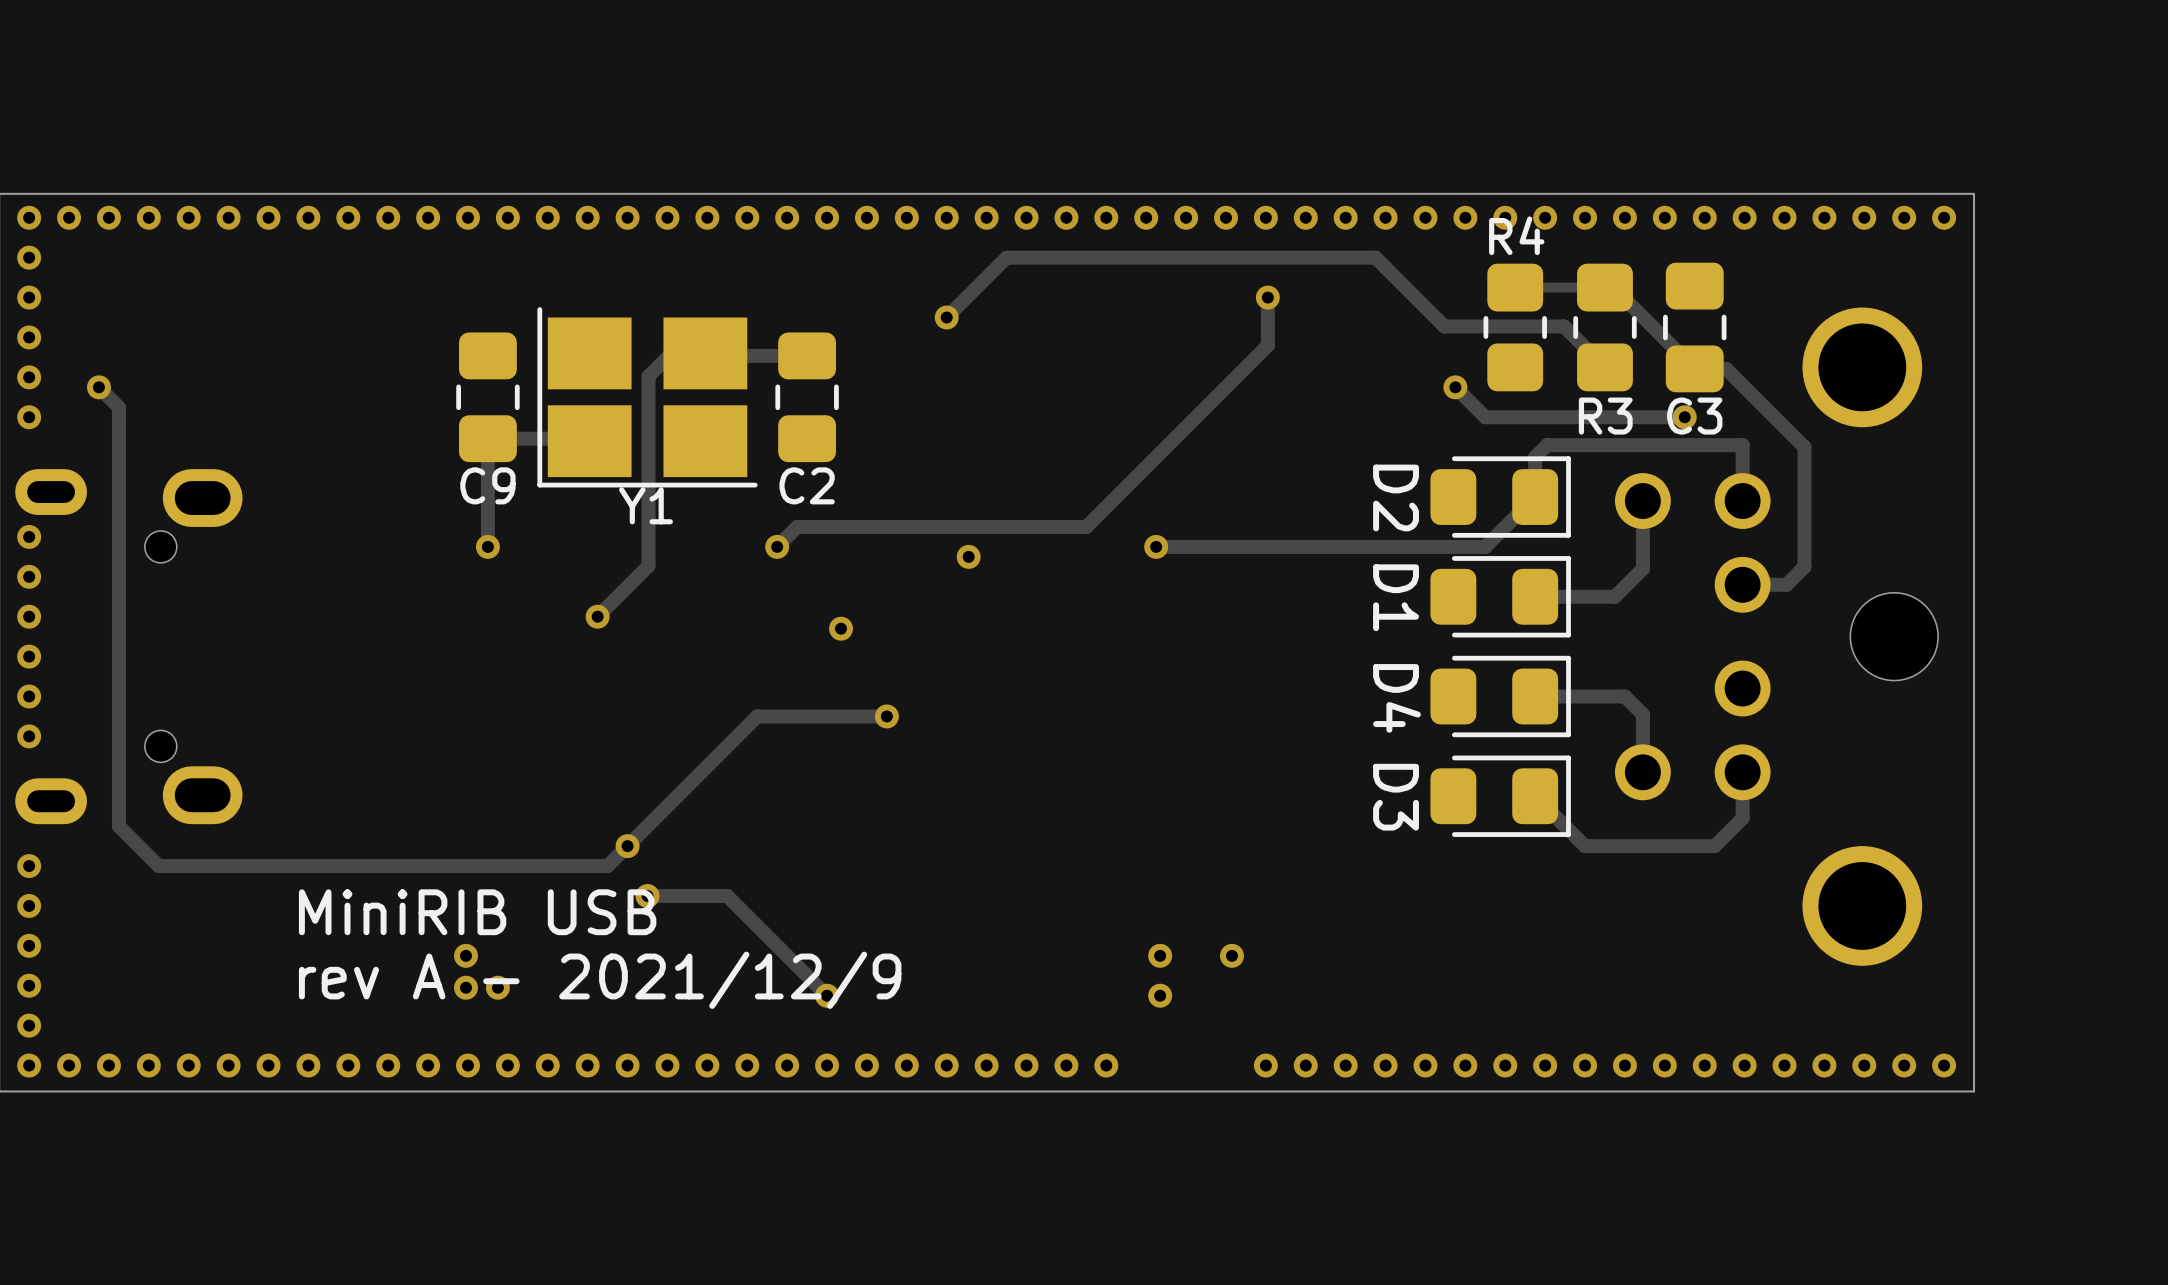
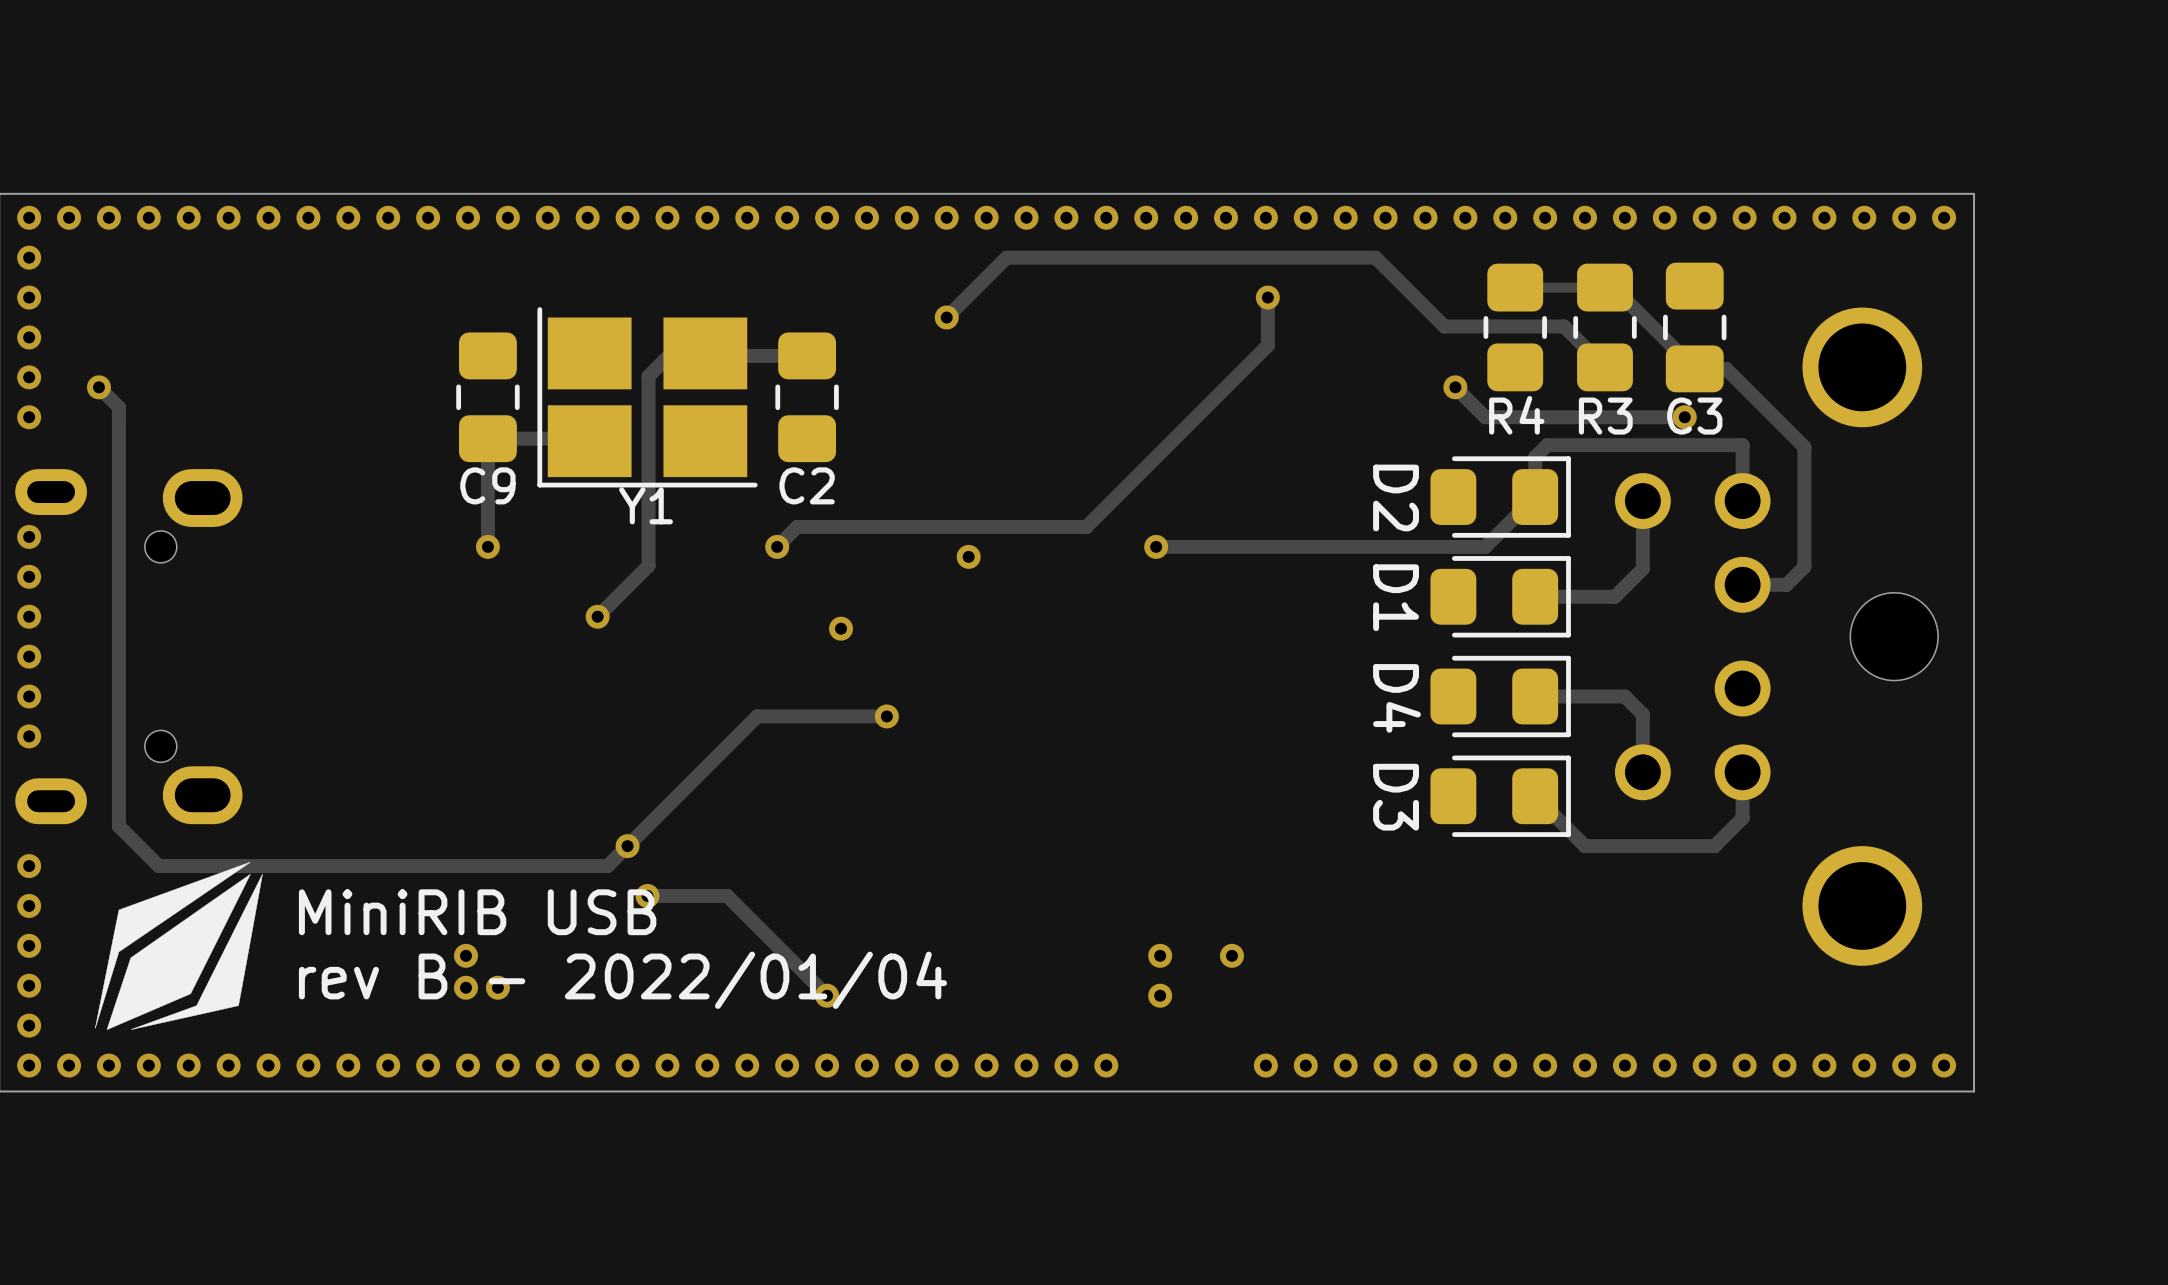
R4 name position: R4 (1516, 235) -> R4 (1516, 415)
drawing: none -> [95, 862, 263, 1030]
text: rev A - 2021/12/9 (600, 980) -> rev B - 2022/01/04 (622, 980)

